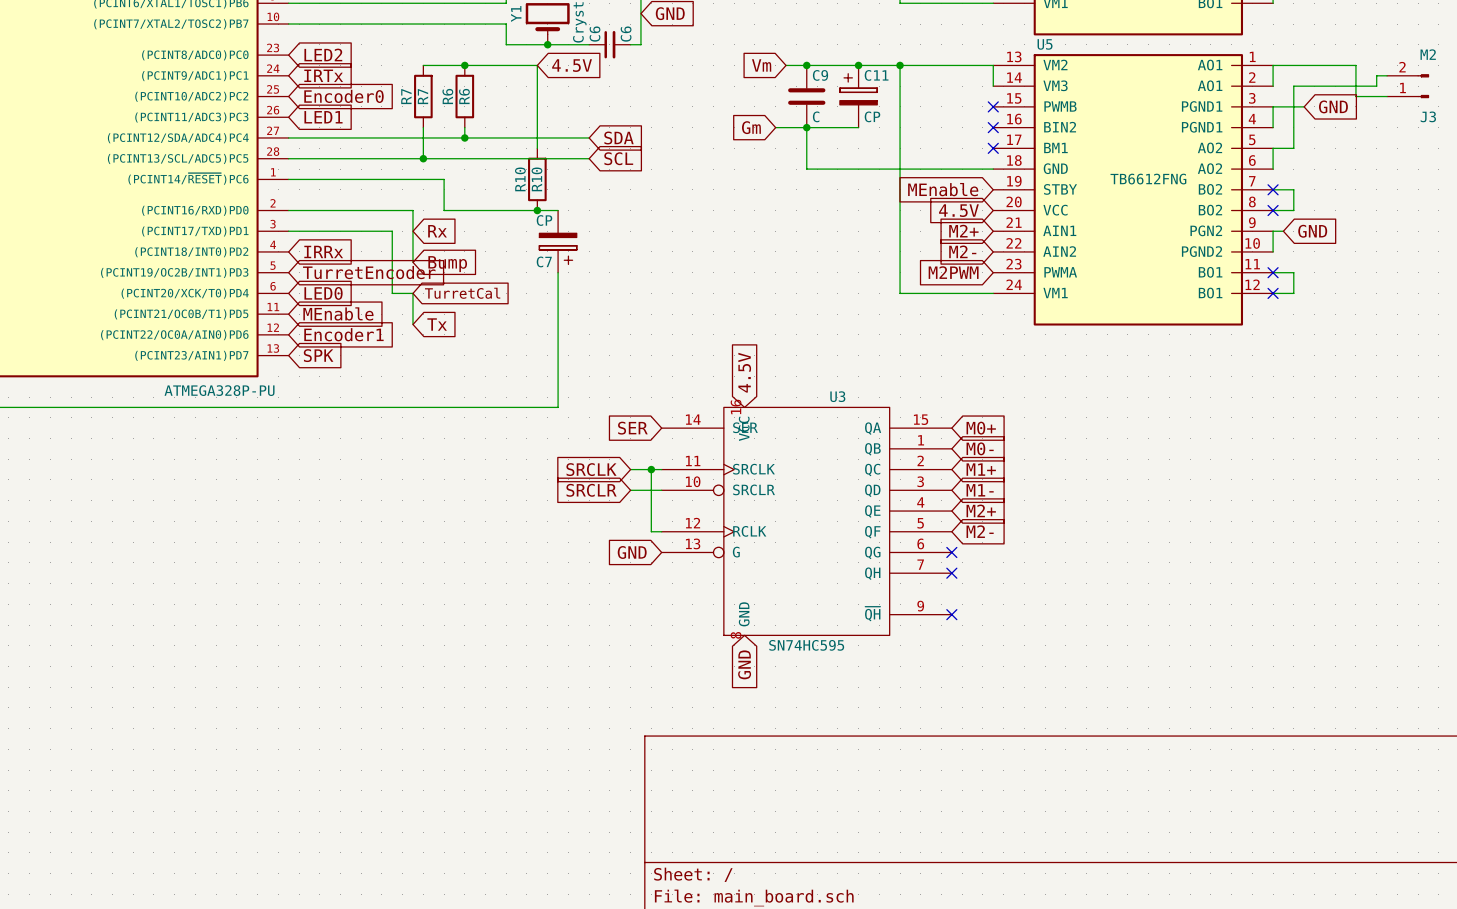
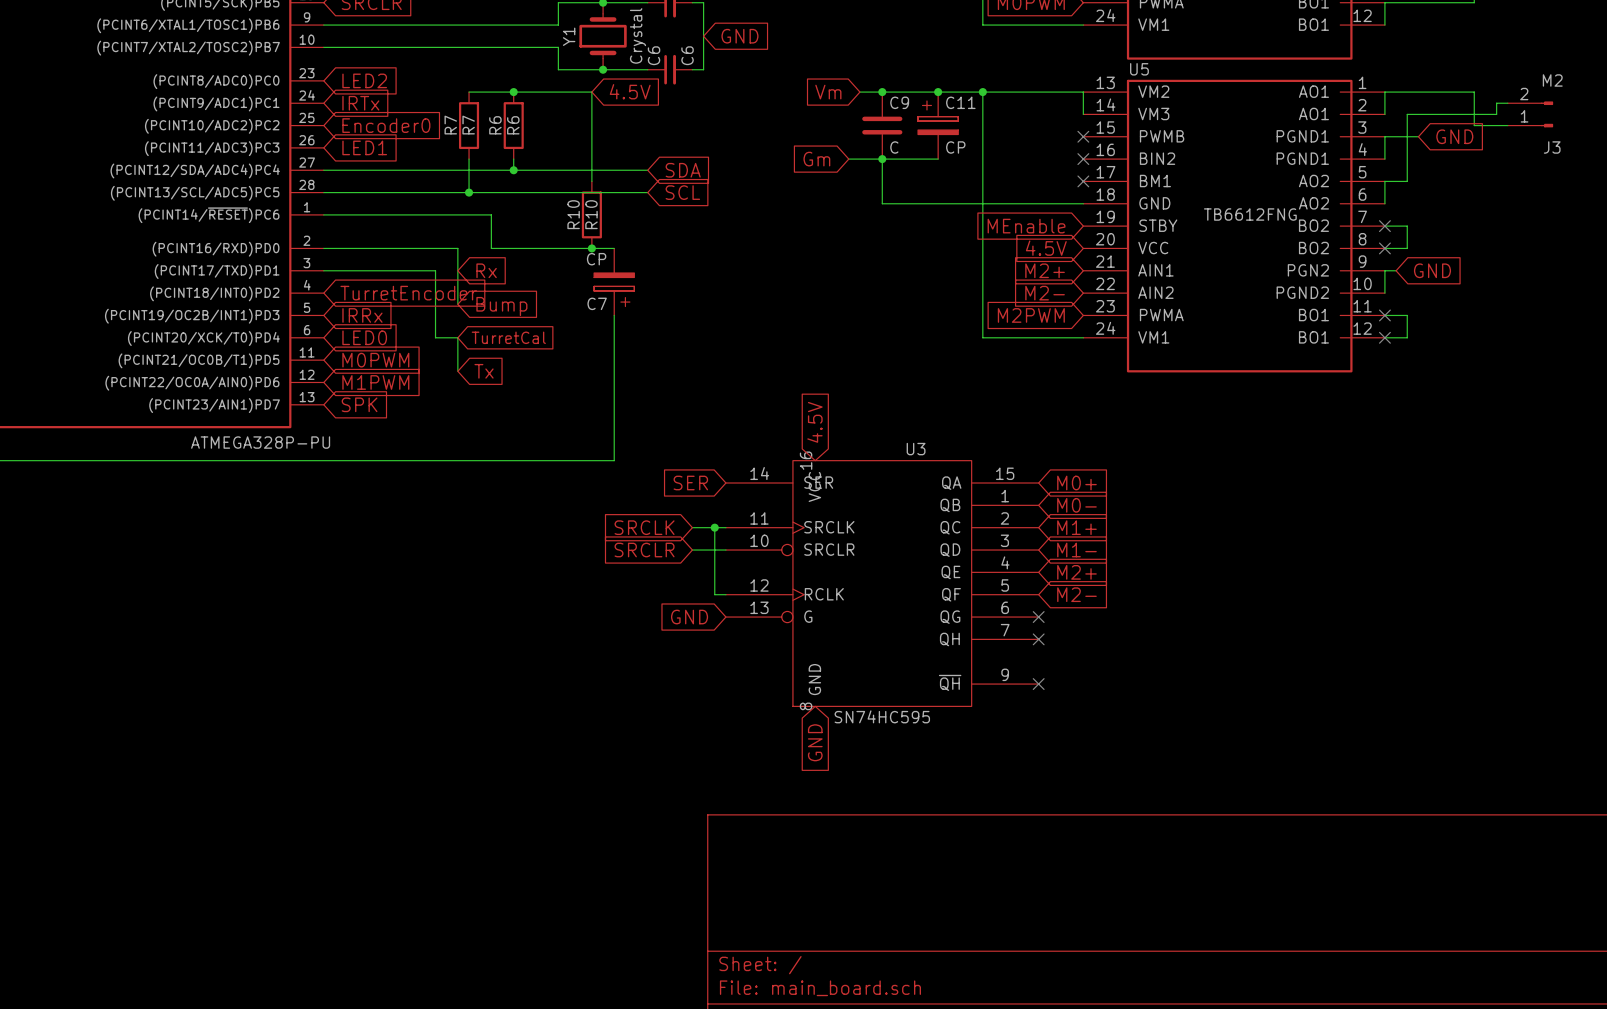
global label: IRRx (323, 251) -> TurretEncoder (408, 293)
global label: TurretEncoder (369, 272) -> IRRx (362, 315)
global label: MEnable (338, 313) -> M0PWM (375, 360)
global label: Encoder1 (343, 334) -> M1PWM (375, 382)

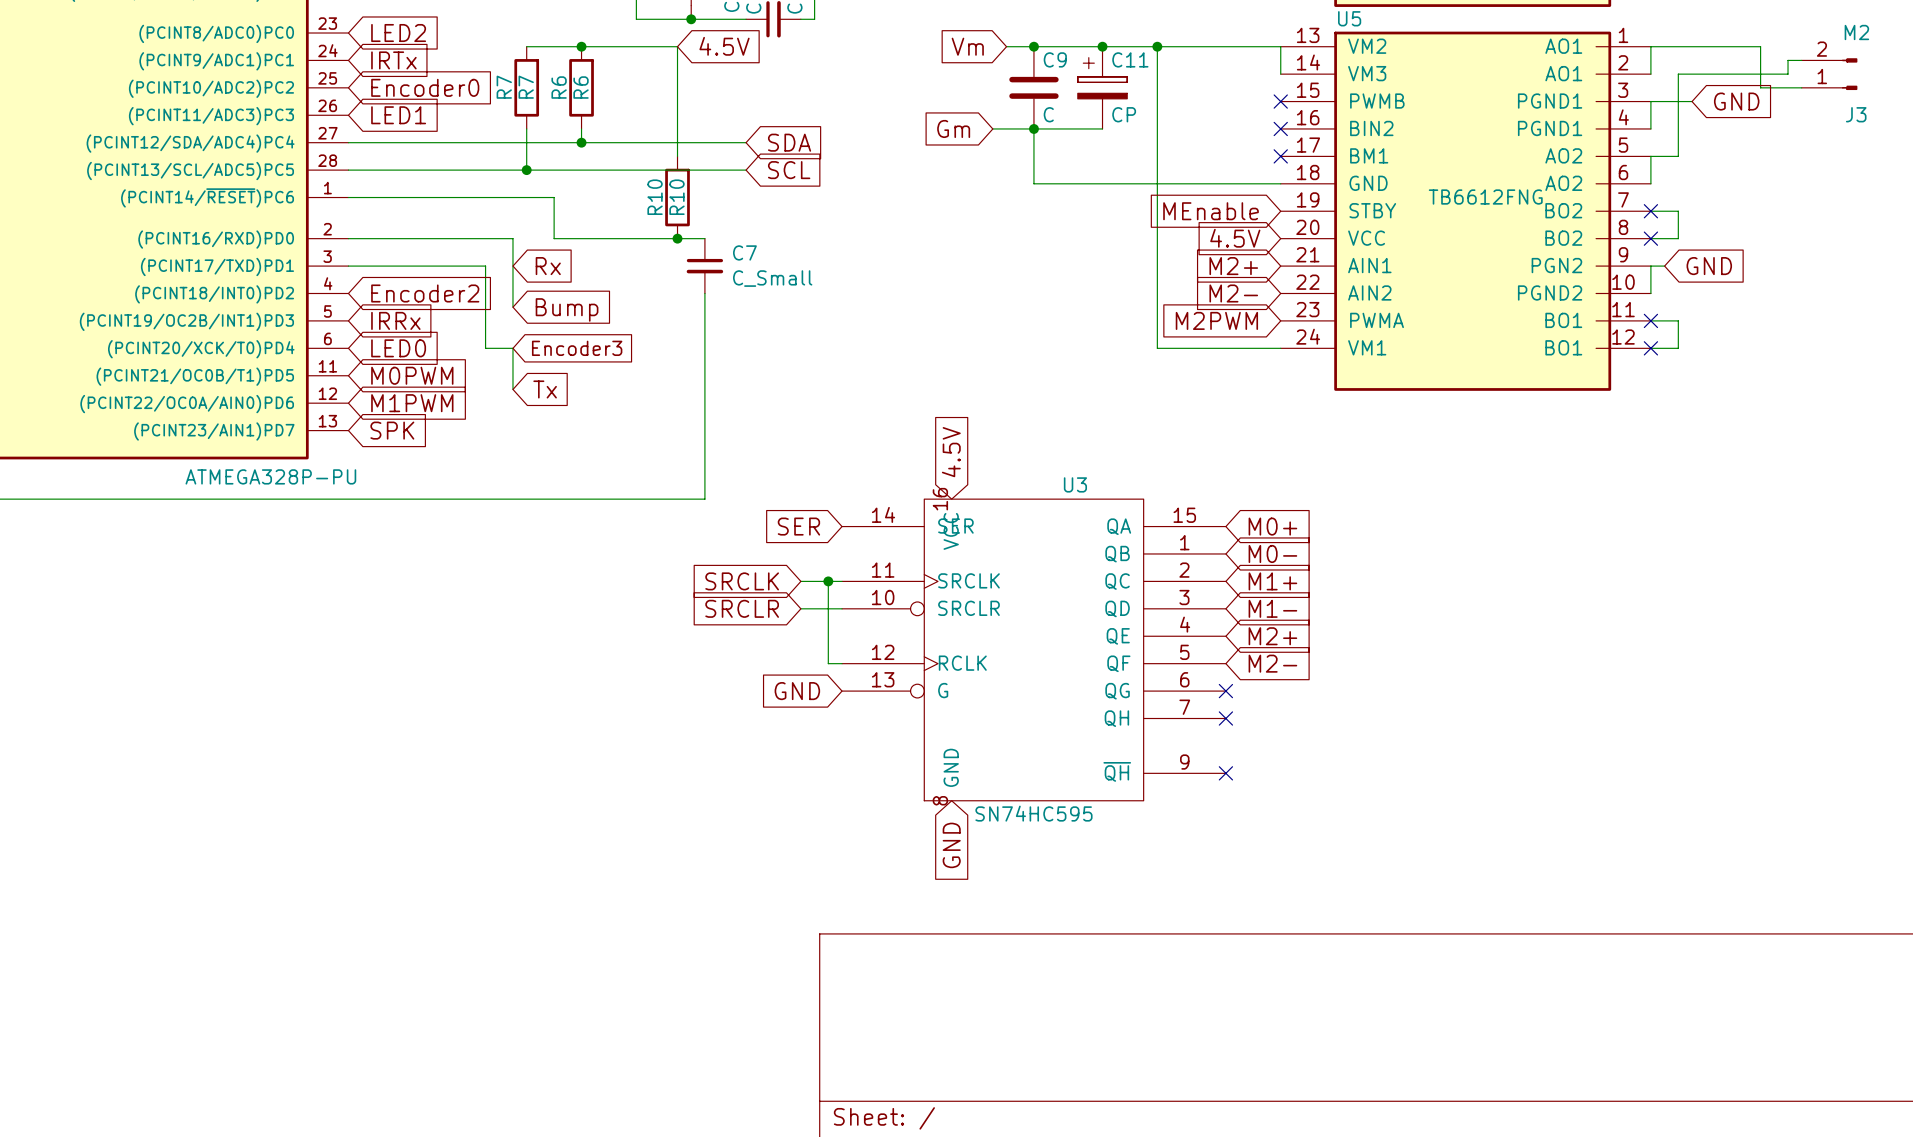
C7 symbol: [594, 248, 635, 316] -> [686, 238, 724, 294]
C7 value: CP (596, 259) -> C_Small (772, 278)
global label: TurretEncoder (408, 293) -> Encoder2 (425, 293)
C7 name position: C7 (597, 303) -> C7 (744, 252)
global label: TurretCal (508, 337) -> Encoder3 (577, 348)

